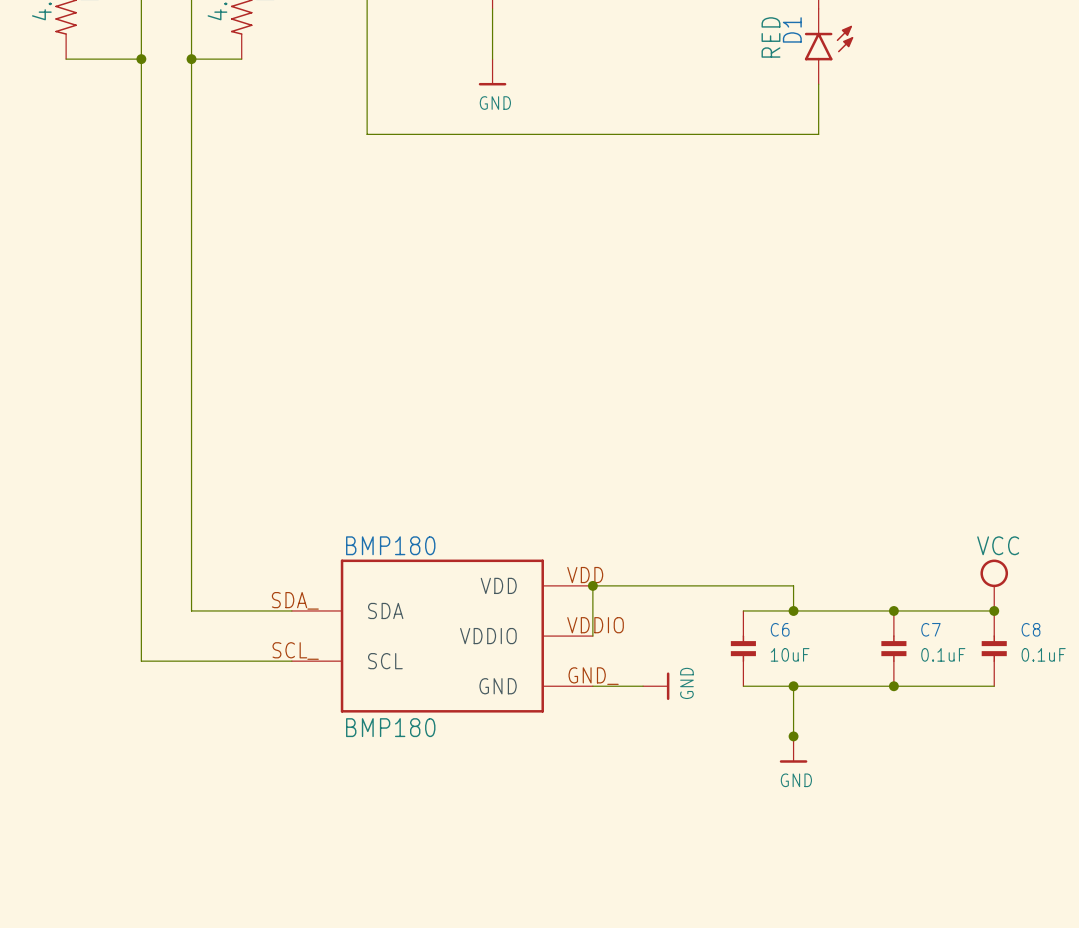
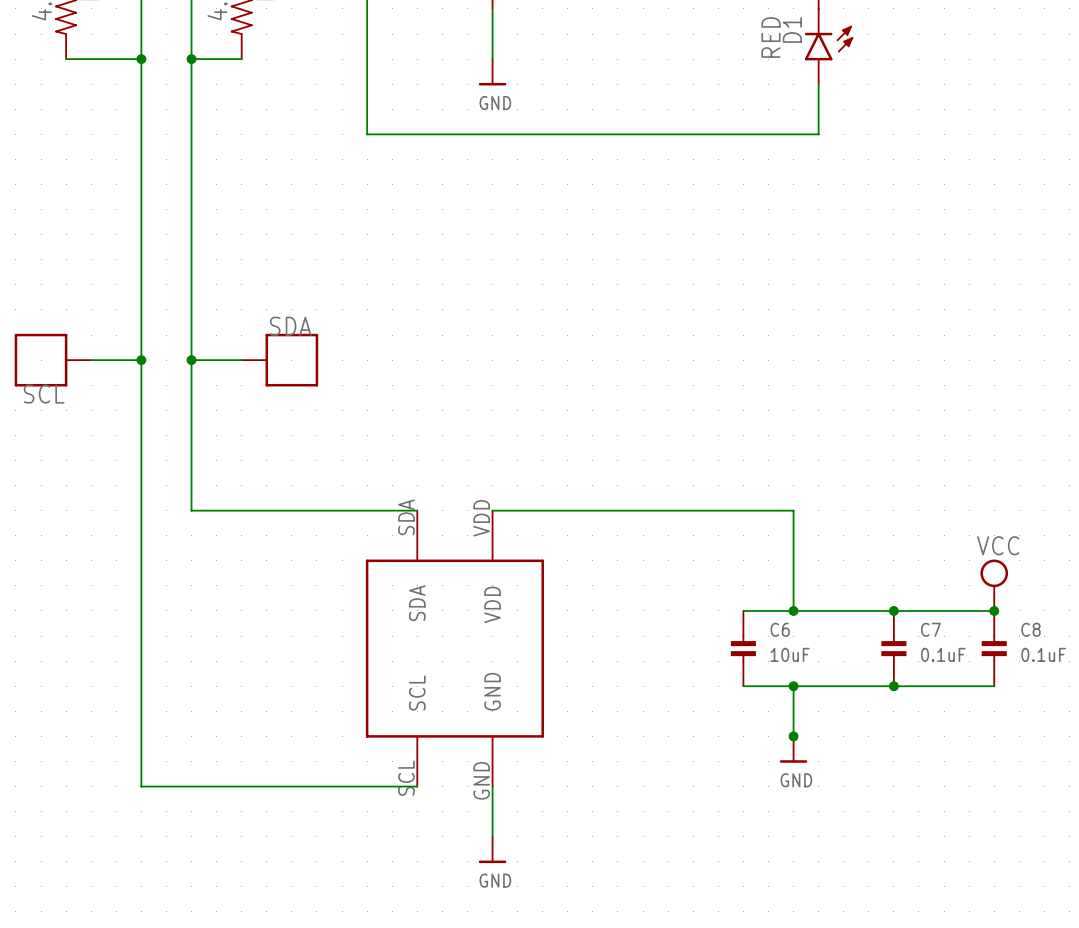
SCL: none -> (52, 360)
wire: none -> (91, 360) (141, 360)
junction: none -> (141, 360)
wire: none -> (191, 360) (241, 360)
junction: none -> (191, 360)
SDA: none -> (279, 360)
wire: (191, 510) (191, 610) (291, 610) -> (191, 510) (417, 510)
junction: (592, 585) -> none
wire: (793, 585) (592, 585) (592, 636) -> (793, 585) (793, 510) (492, 510)
BMP180: BMP180 (442, 636) -> none
part: none -> (454, 648)
wire: (141, 661) (291, 661) -> (141, 661) (141, 786) (417, 786)
wire: (592, 686) (643, 686) -> none
power symbol position: GND (656, 686) -> GND (492, 849)
power symbol rotation: 0° (668, 686) -> 90° clockwise (492, 861)
wire: none -> (492, 786) (492, 836)

